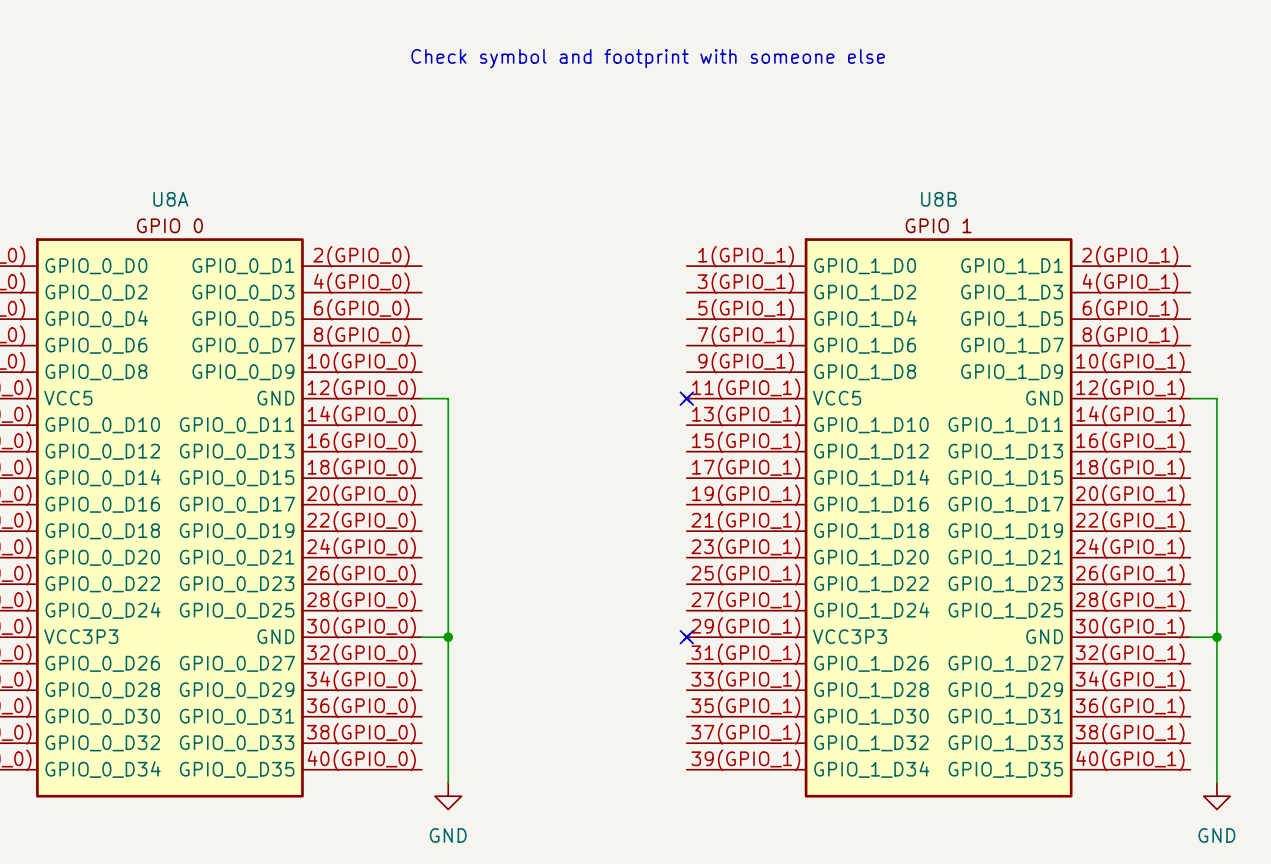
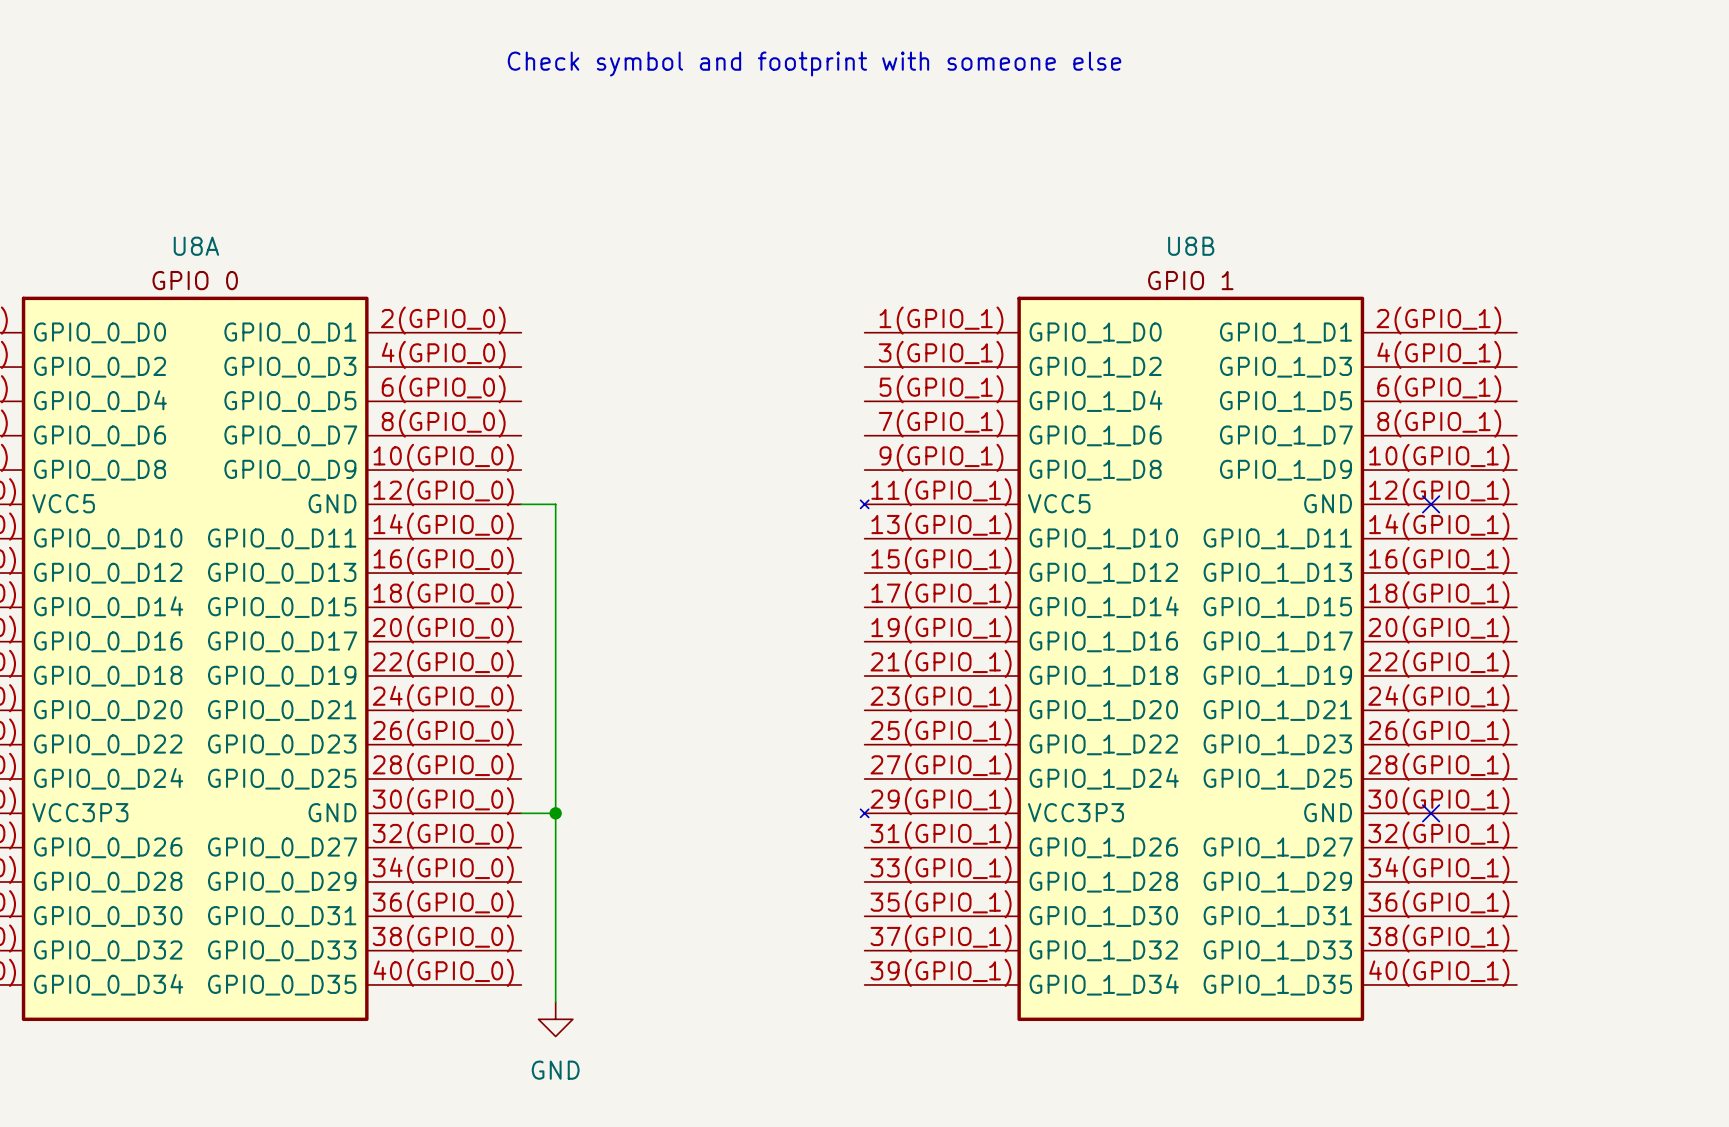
no-connect mark: (686, 398) -> none
no-connect mark: none -> (1431, 504)
wire: (1190, 398) (1216, 398) (1216, 782) -> none
no-connect mark: (686, 637) -> none
no-connect mark: none -> (1431, 813)
wire: (1190, 637) (1216, 637) -> none
junction: (1216, 637) -> none
power symbol: GND (1216, 796) -> none

